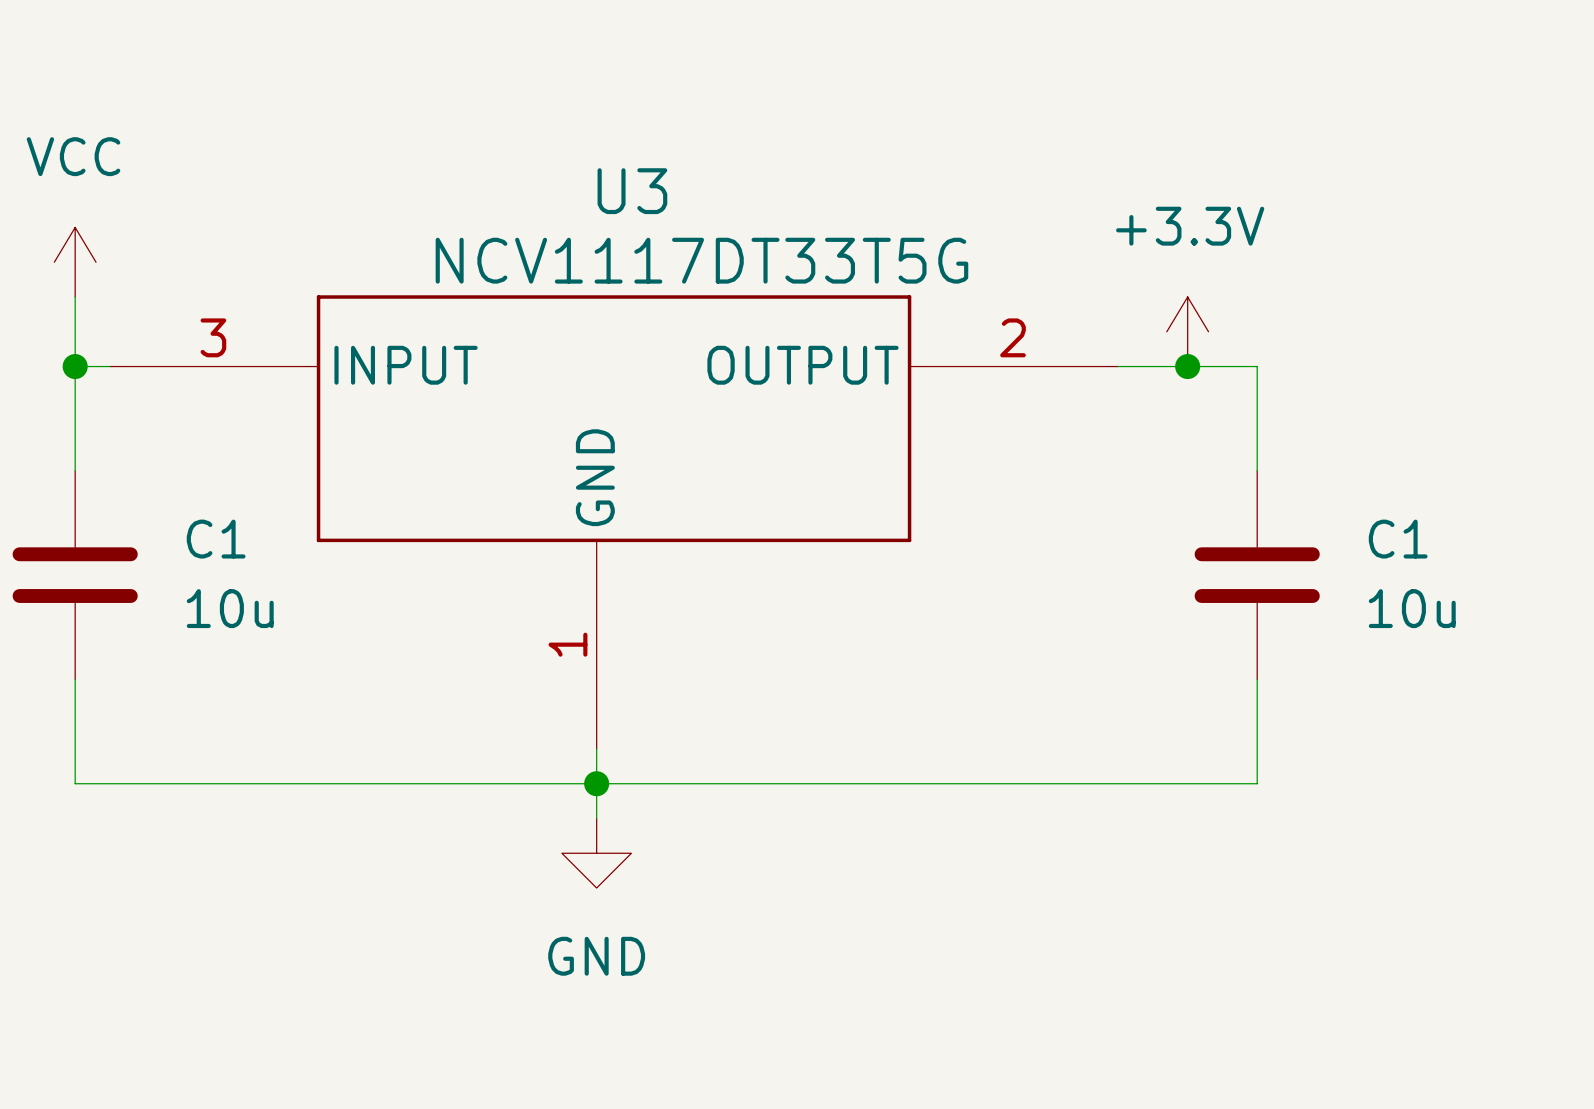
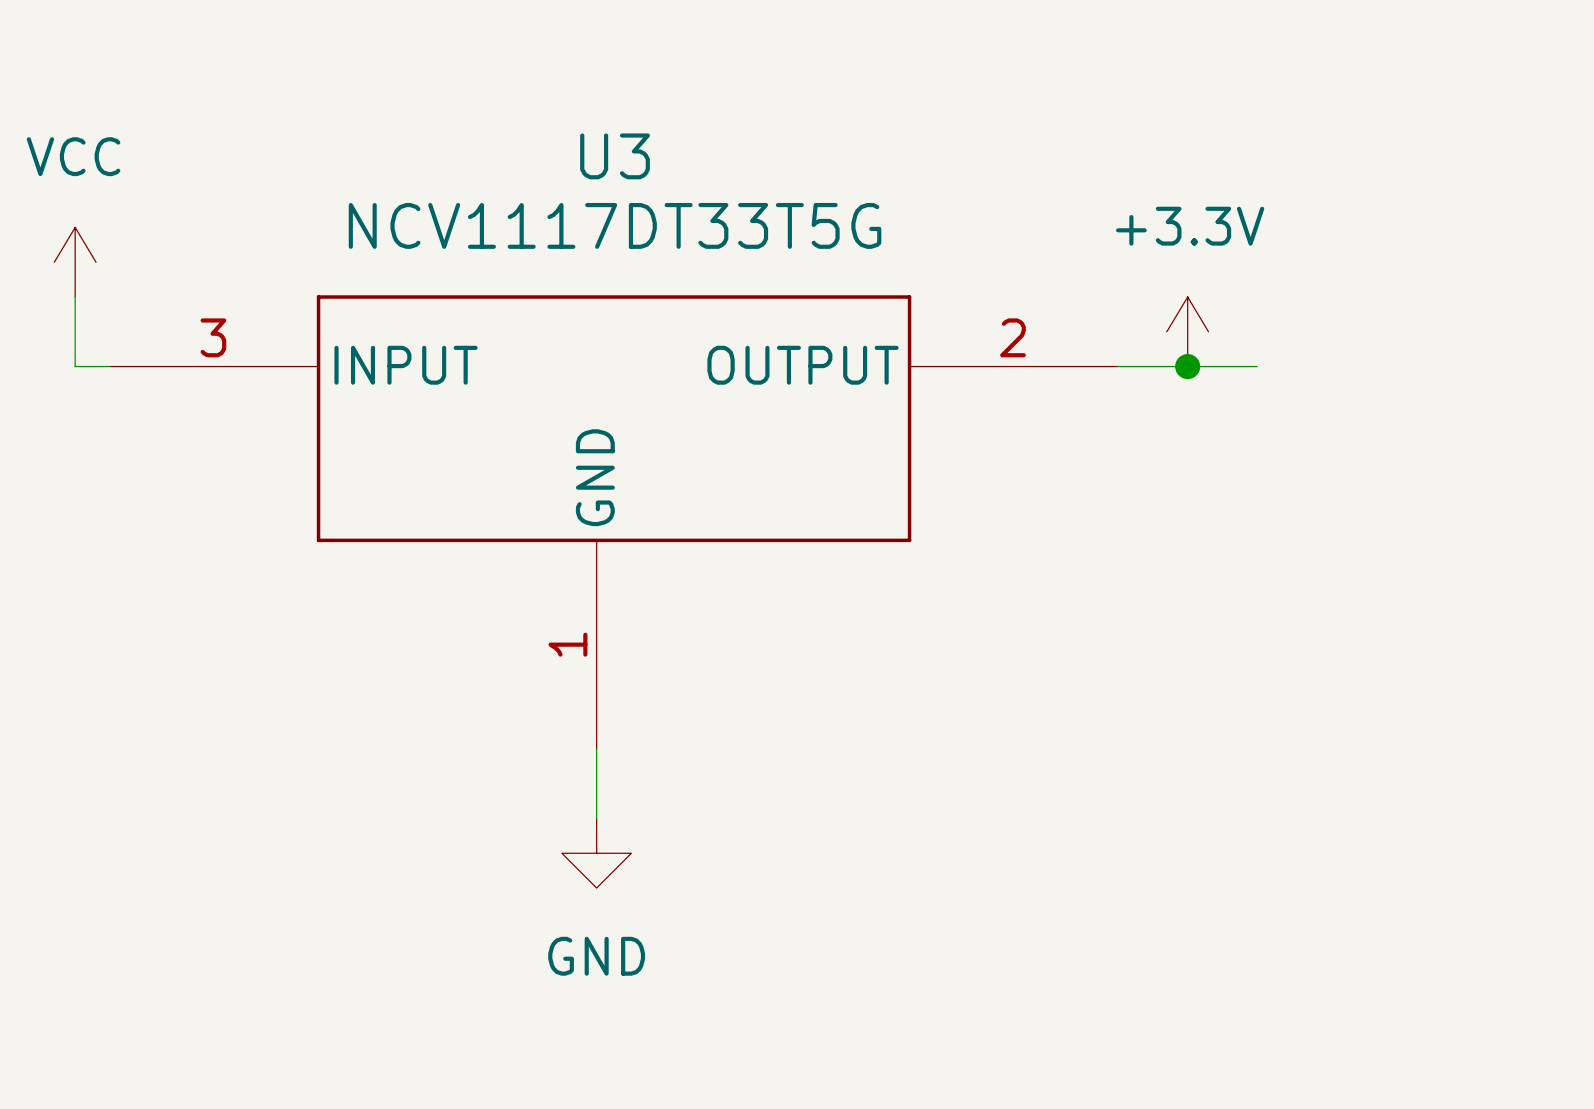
U3 name position: U3 (632, 191) -> U3 (615, 156)
U3 value position: NCV1117DT33T5G (701, 260) -> NCV1117DT33T5G (615, 225)
wire: (75, 366) (75, 470) -> none
junction: (75, 366) -> none
wire: (1257, 366) (1257, 470) -> none
C1: 10u (75, 575) -> none
C1: 10u (1257, 575) -> none
wire: (75, 679) (75, 783) (1257, 783) (1257, 679) -> none
junction: (596, 783) -> none

